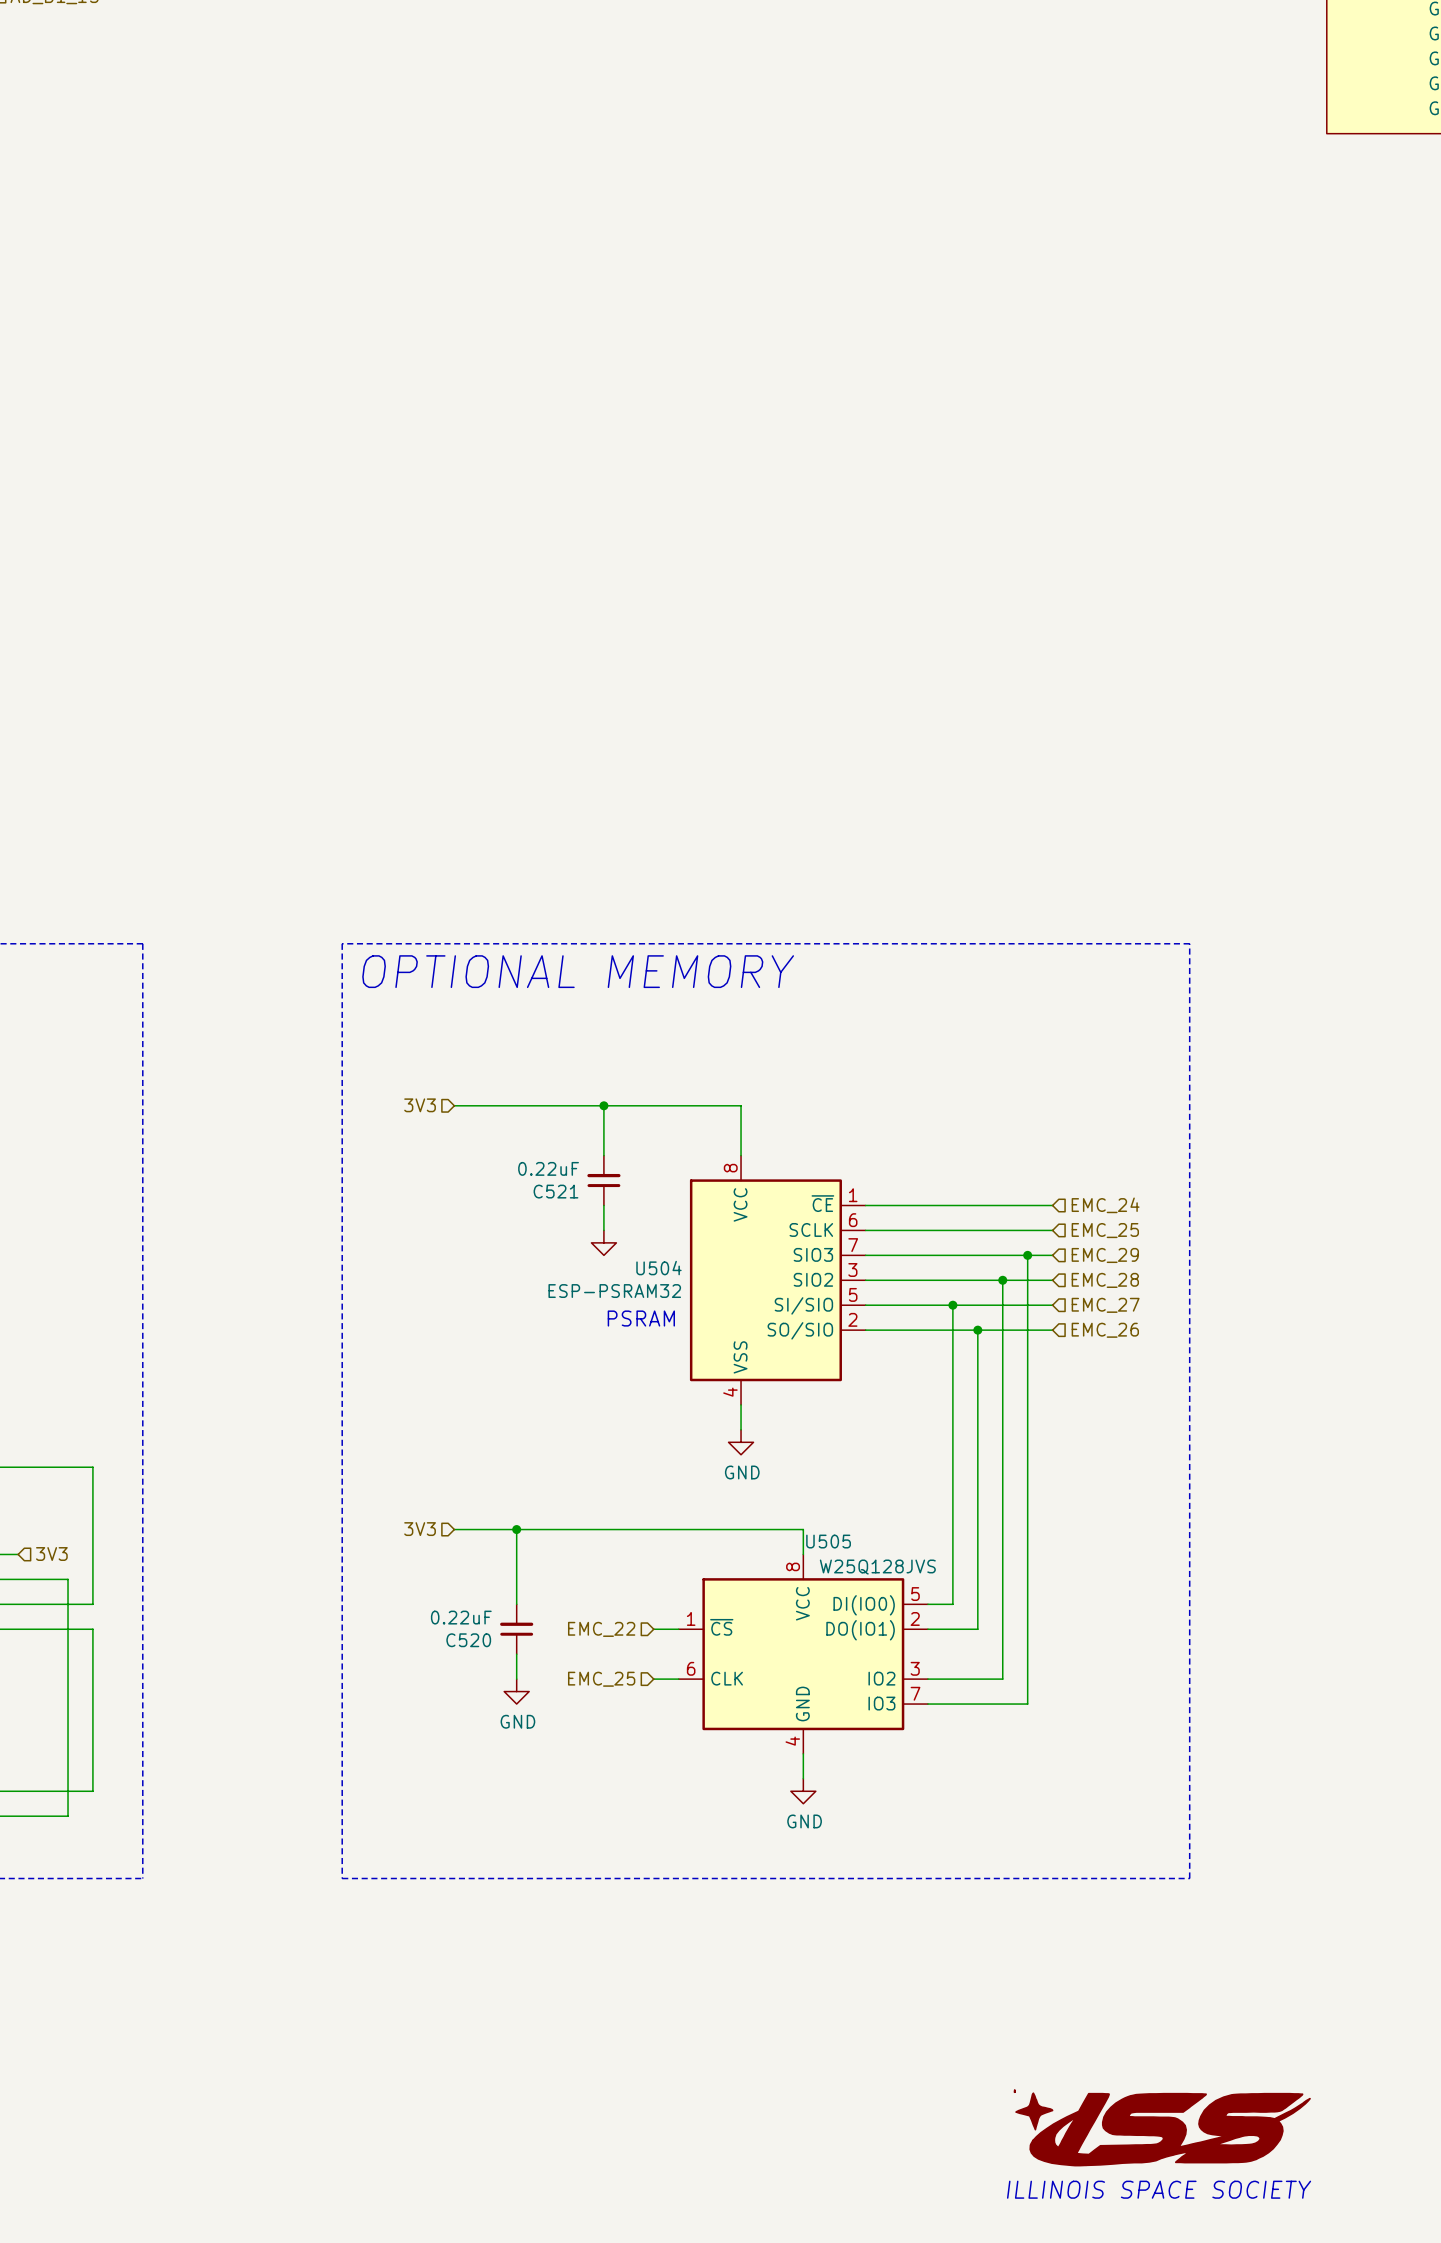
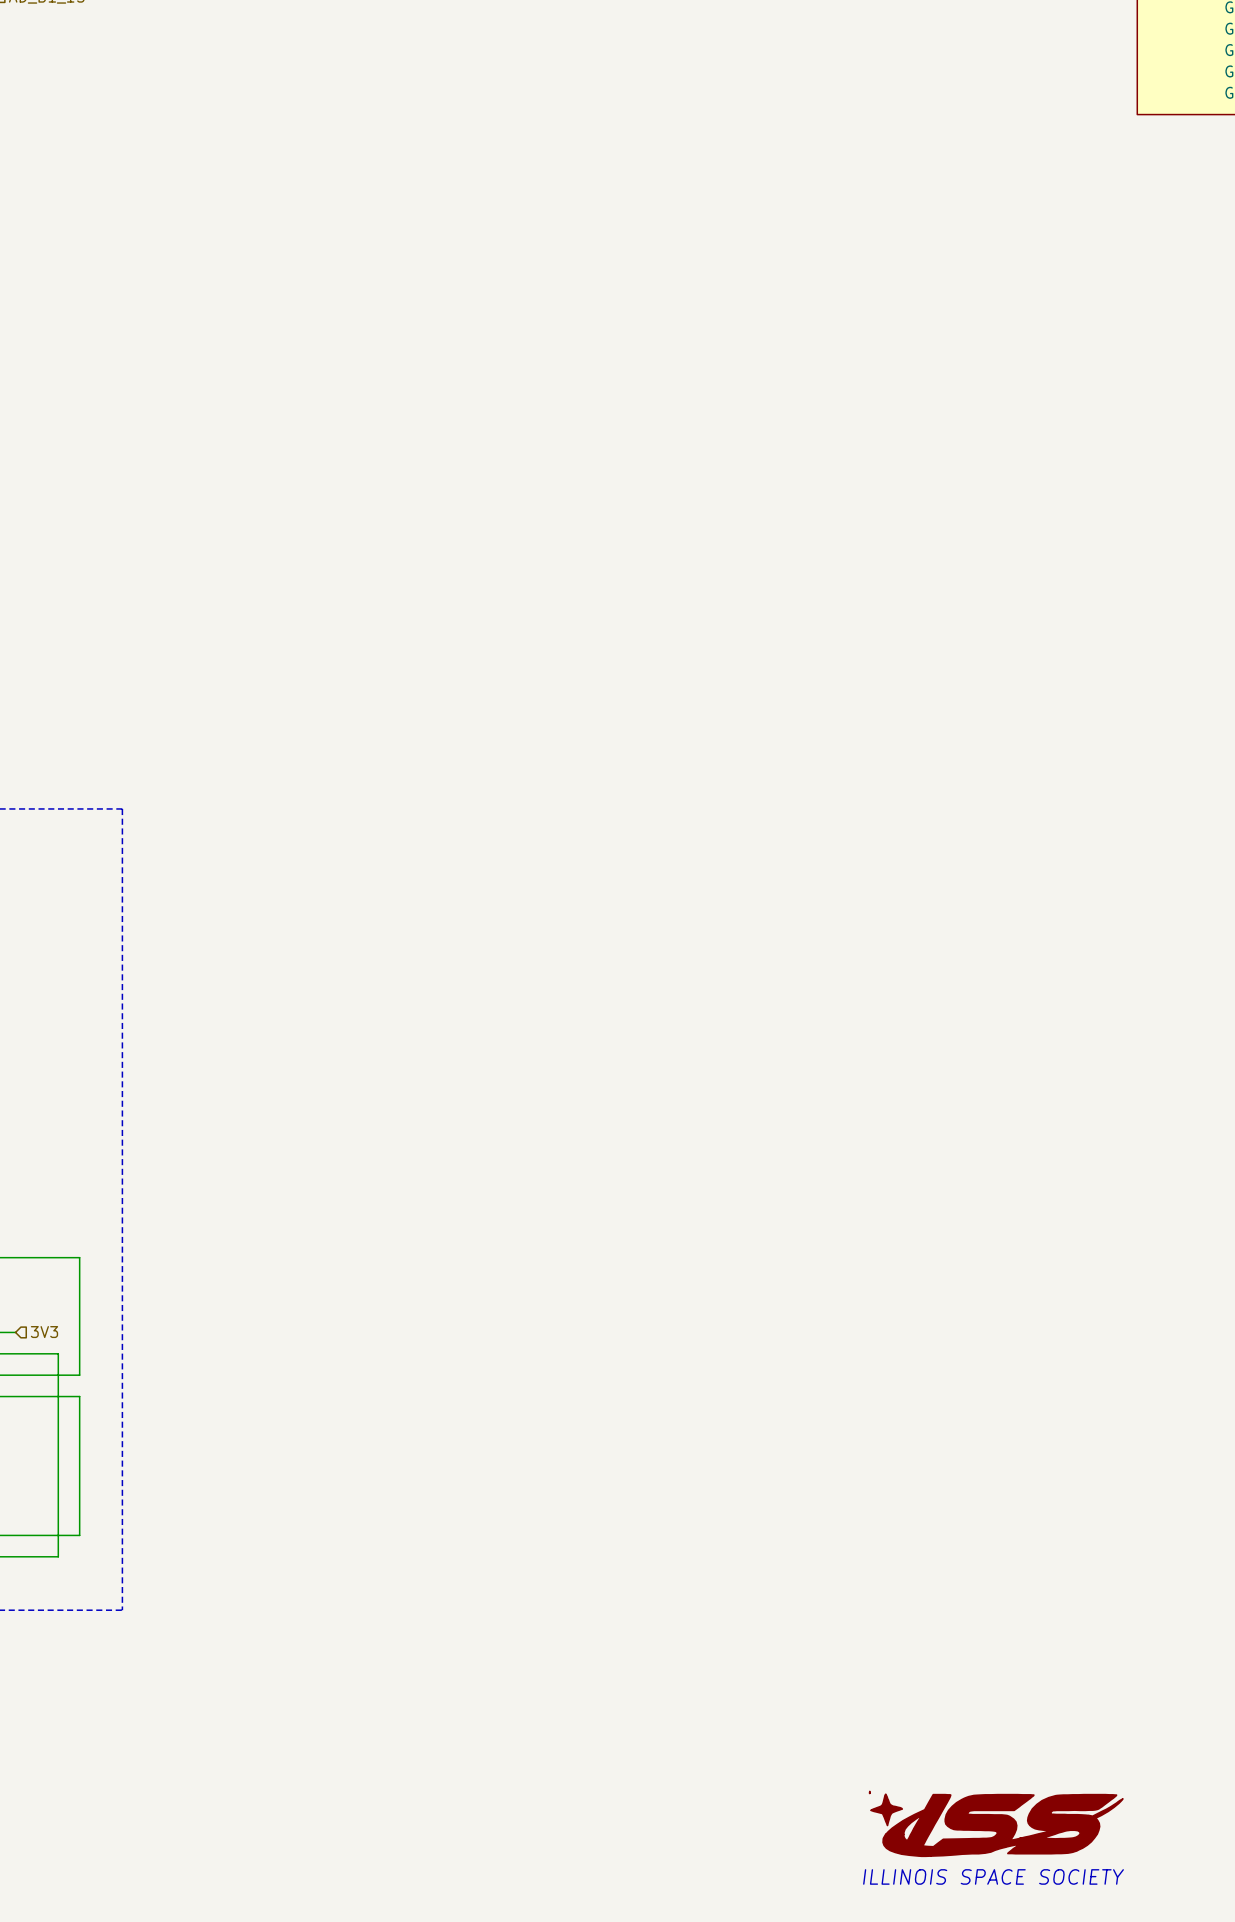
line: (342, 943) (342, 1878) (1189, 1878) (1189, 943) (342, 943) -> none
text: OPTIONAL MEMORY (578, 971) -> none
hierarchical label: 3V3 (420, 1105) -> none
wire: (454, 1105) (741, 1105) (741, 1155) -> none
wire: (603, 1105) (603, 1155) -> none
junction: (603, 1105) -> none
C521: 0.22uF (603, 1180) -> none
wire: (603, 1205) (603, 1230) -> none
wire: (865, 1205) (1052, 1205) -> none
hierarchical label: EMC_24 (1105, 1205) -> none
wire: (865, 1230) (1052, 1230) -> none
hierarchical label: EMC_25 (1105, 1230) -> none
power symbol: (603, 1242) -> none
wire: (865, 1255) (1052, 1255) -> none
wire: (1027, 1255) (1027, 1704) (927, 1704) -> none
junction: (1027, 1255) -> none
hierarchical label: EMC_29 (1105, 1255) -> none
U504: ESP-PSRAM32 (777, 1280) -> none
wire: (865, 1280) (1052, 1280) -> none
wire: (1002, 1280) (1002, 1679) (927, 1679) -> none
junction: (1002, 1280) -> none
hierarchical label: EMC_28 (1105, 1280) -> none
wire: (865, 1305) (1052, 1305) -> none
wire: (952, 1305) (952, 1604) (927, 1604) -> none
junction: (952, 1305) -> none
hierarchical label: EMC_27 (1105, 1305) -> none
text: PSRAM (641, 1318) -> none
wire: (865, 1330) (1052, 1330) -> none
wire: (977, 1330) (977, 1629) (927, 1629) -> none
junction: (977, 1330) -> none
hierarchical label: EMC_26 (1105, 1330) -> none
wire: (741, 1404) (741, 1429) -> none
power symbol: GND (741, 1442) -> none
hierarchical label: 3V3 (420, 1529) -> none
wire: (454, 1529) (803, 1529) (803, 1554) -> none
wire: (516, 1529) (516, 1604) -> none
junction: (516, 1529) -> none
C520: 0.22uF (516, 1629) -> none
hierarchical label: EMC_22 (601, 1629) -> none
wire: (653, 1629) (678, 1629) -> none
wire: (516, 1654) (516, 1679) -> none
U505: W25Q128JVS (803, 1654) -> none
hierarchical label: EMC_25 (601, 1679) -> none
wire: (653, 1679) (678, 1679) -> none
power symbol: GND (516, 1691) -> none
wire: (803, 1753) (803, 1778) -> none
power symbol: GND (803, 1791) -> none

